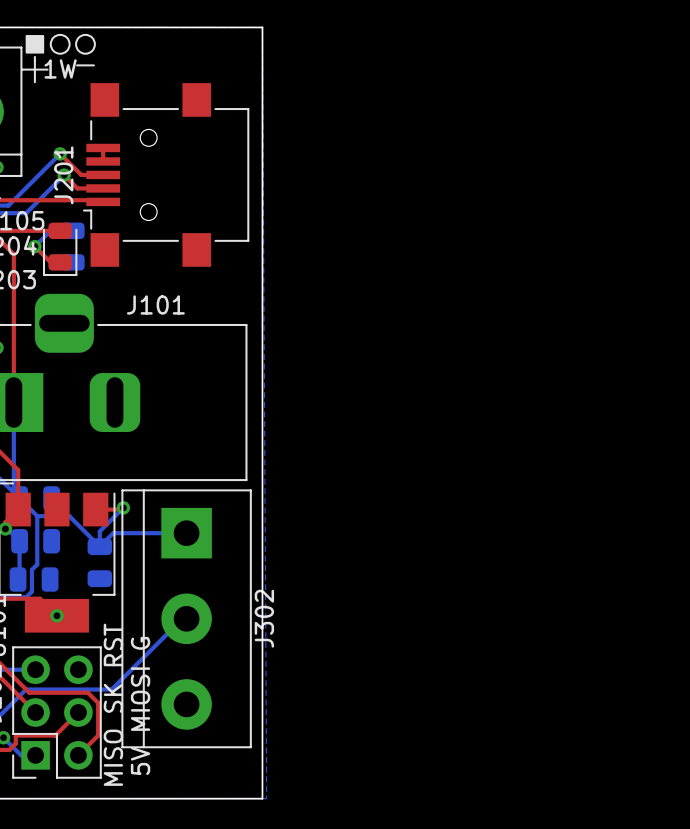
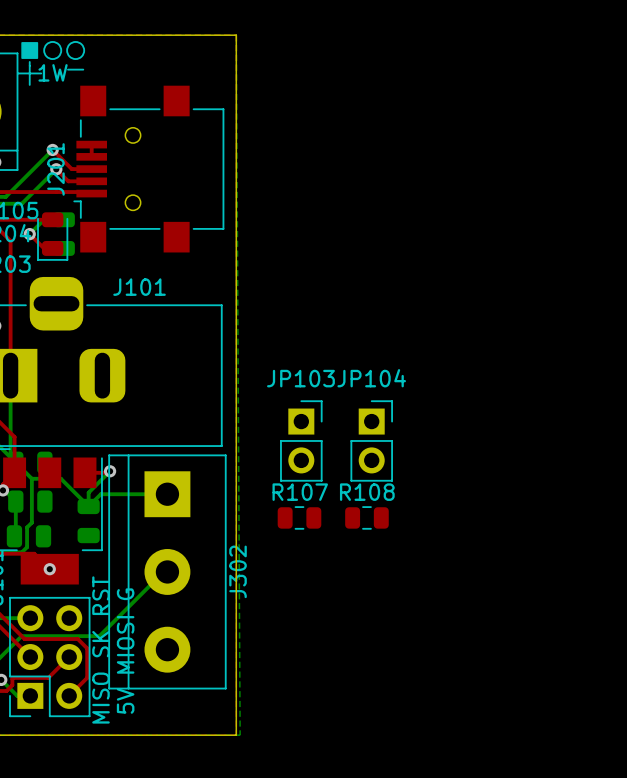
JP103: none -> (301, 440)
JP104: none -> (371, 440)
R107: none -> (299, 517)
R108: none -> (366, 517)

